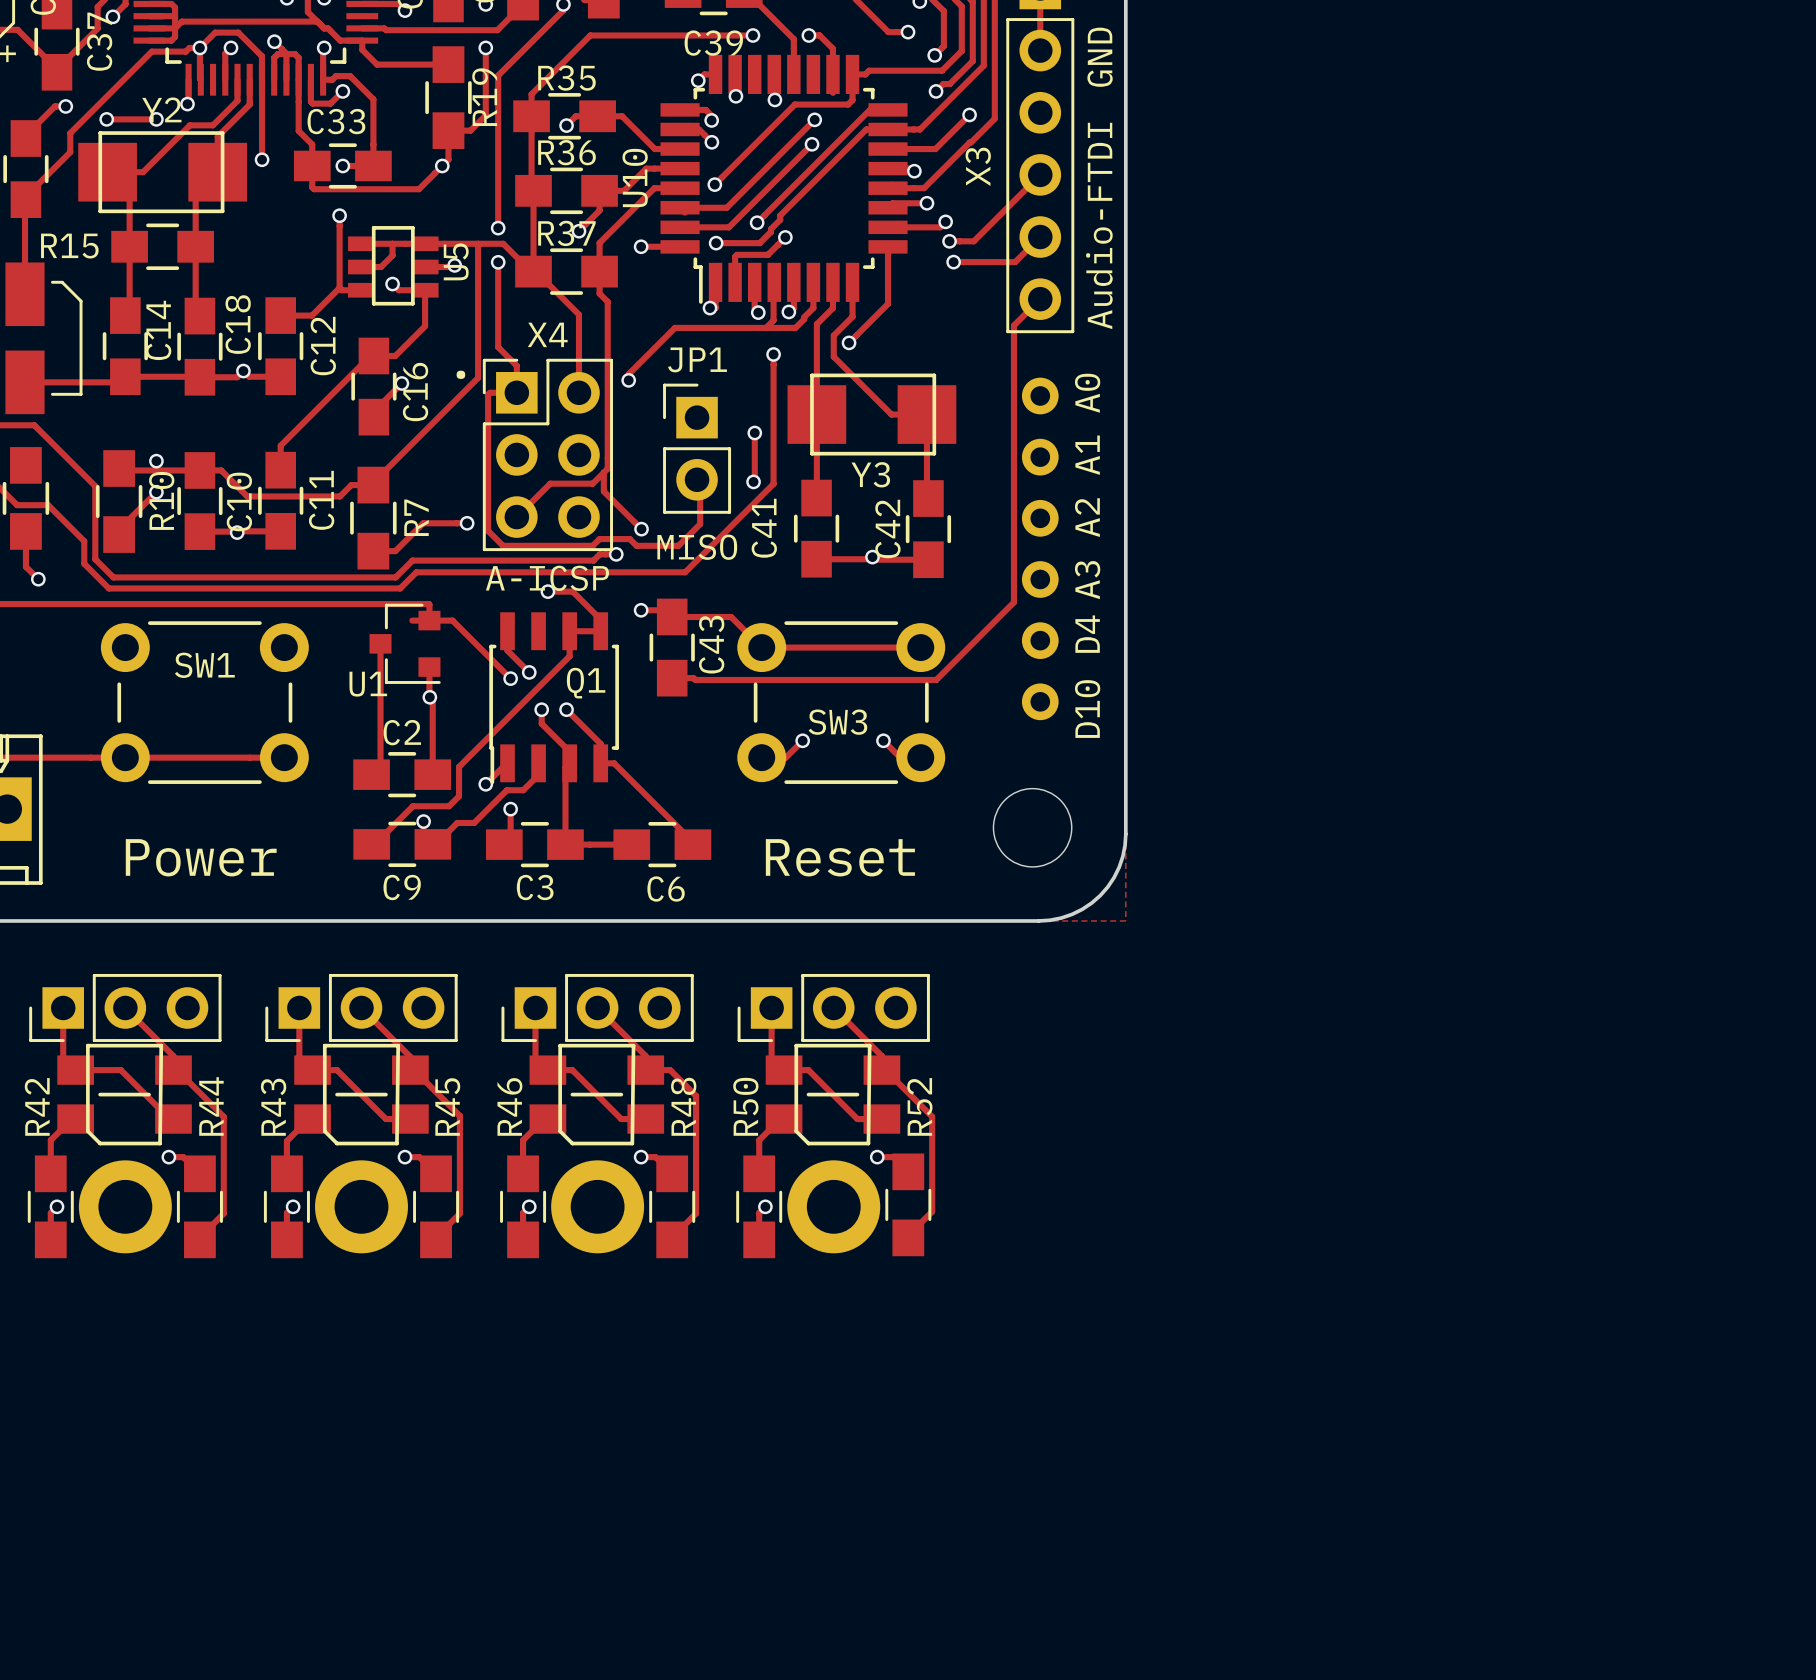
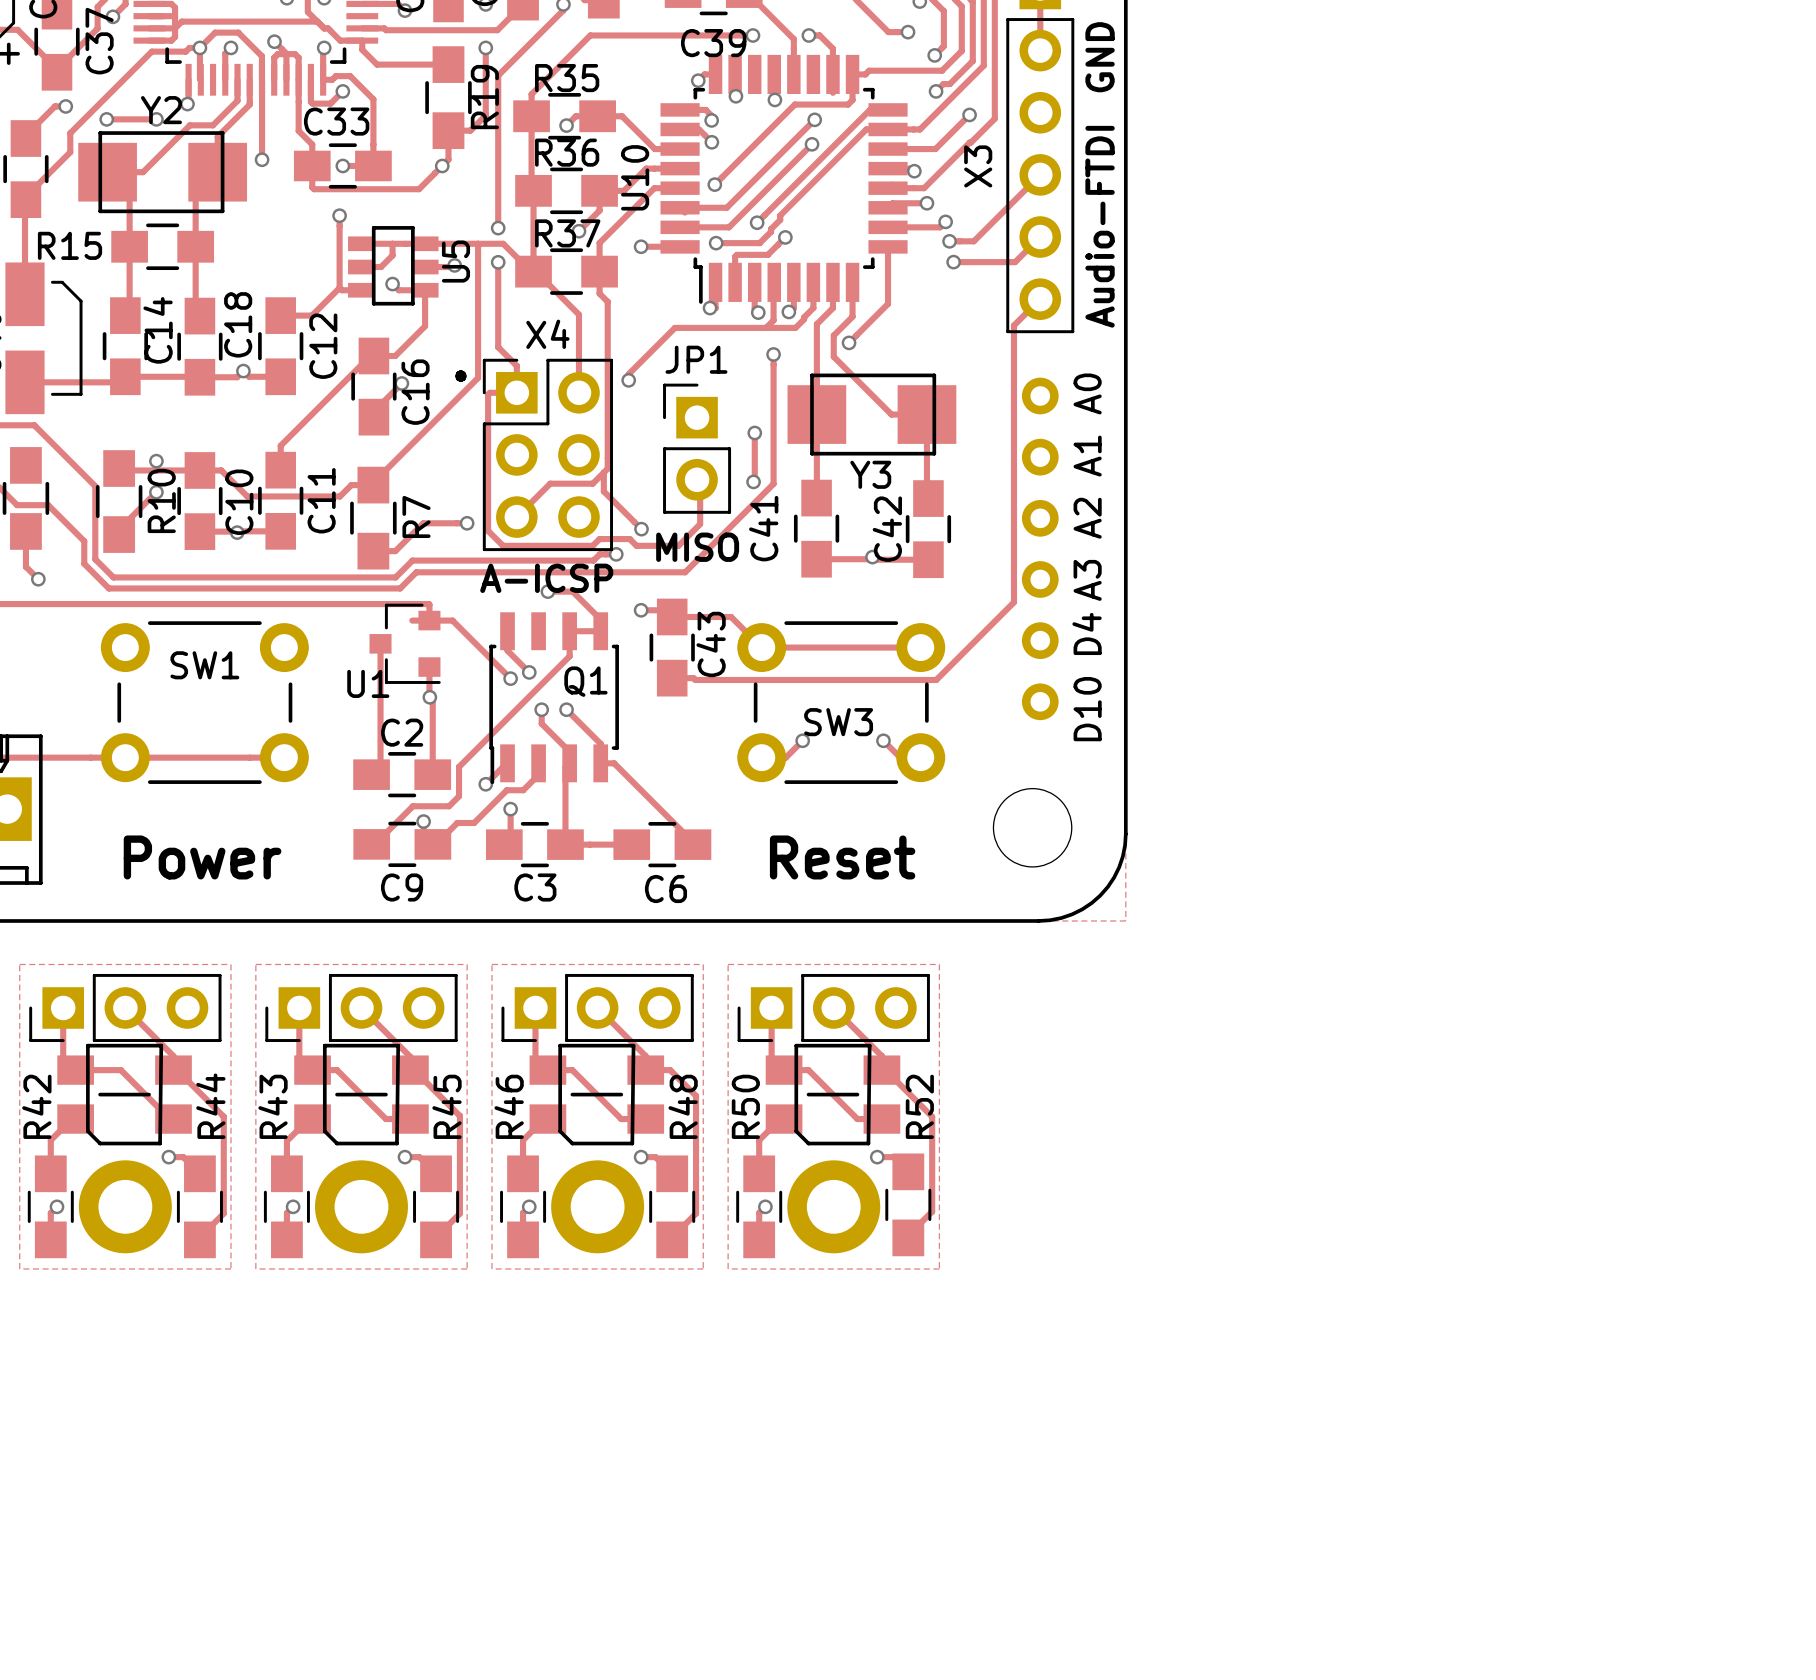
zone outline: none -> (19, 964) (230, 964) (230, 1268) (19, 1268) (19, 964)
zone outline: none -> (255, 964) (467, 964) (467, 1268) (255, 1268) (255, 964)
zone outline: none -> (491, 964) (703, 964) (703, 1268) (491, 1268) (491, 964)
zone outline: none -> (728, 964) (939, 964) (939, 1268) (728, 1268) (728, 964)

